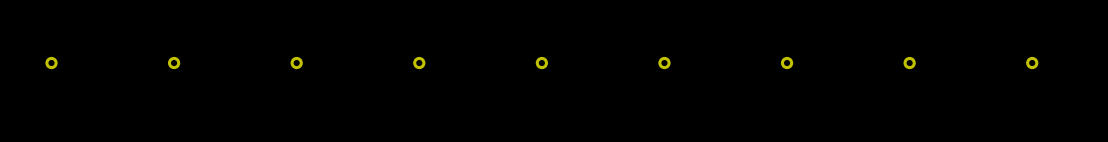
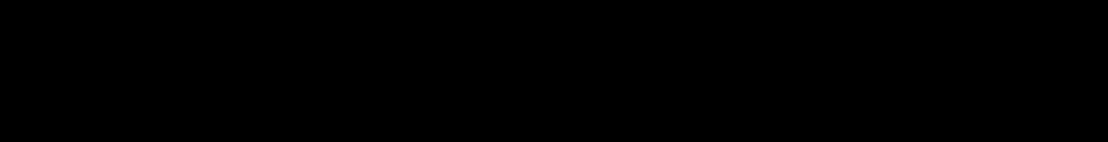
part: (51, 63) -> none
part: (174, 63) -> none
part: (296, 63) -> none
part: (419, 63) -> none
part: (541, 63) -> none
part: (664, 63) -> none
part: (787, 63) -> none
part: (909, 63) -> none
part: (1032, 63) -> none

